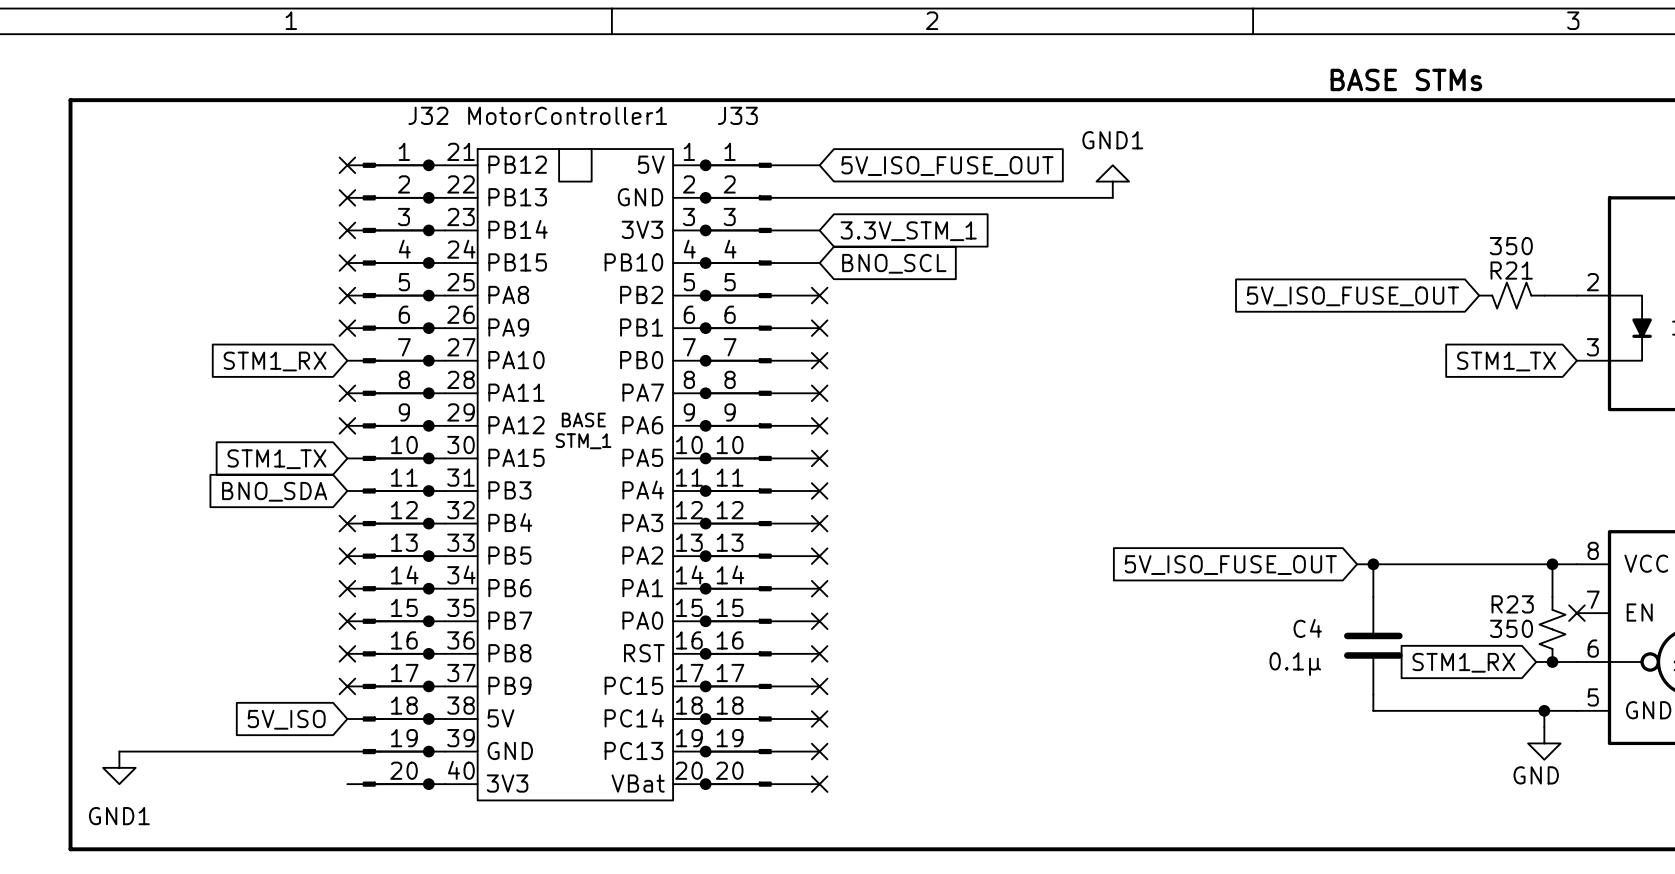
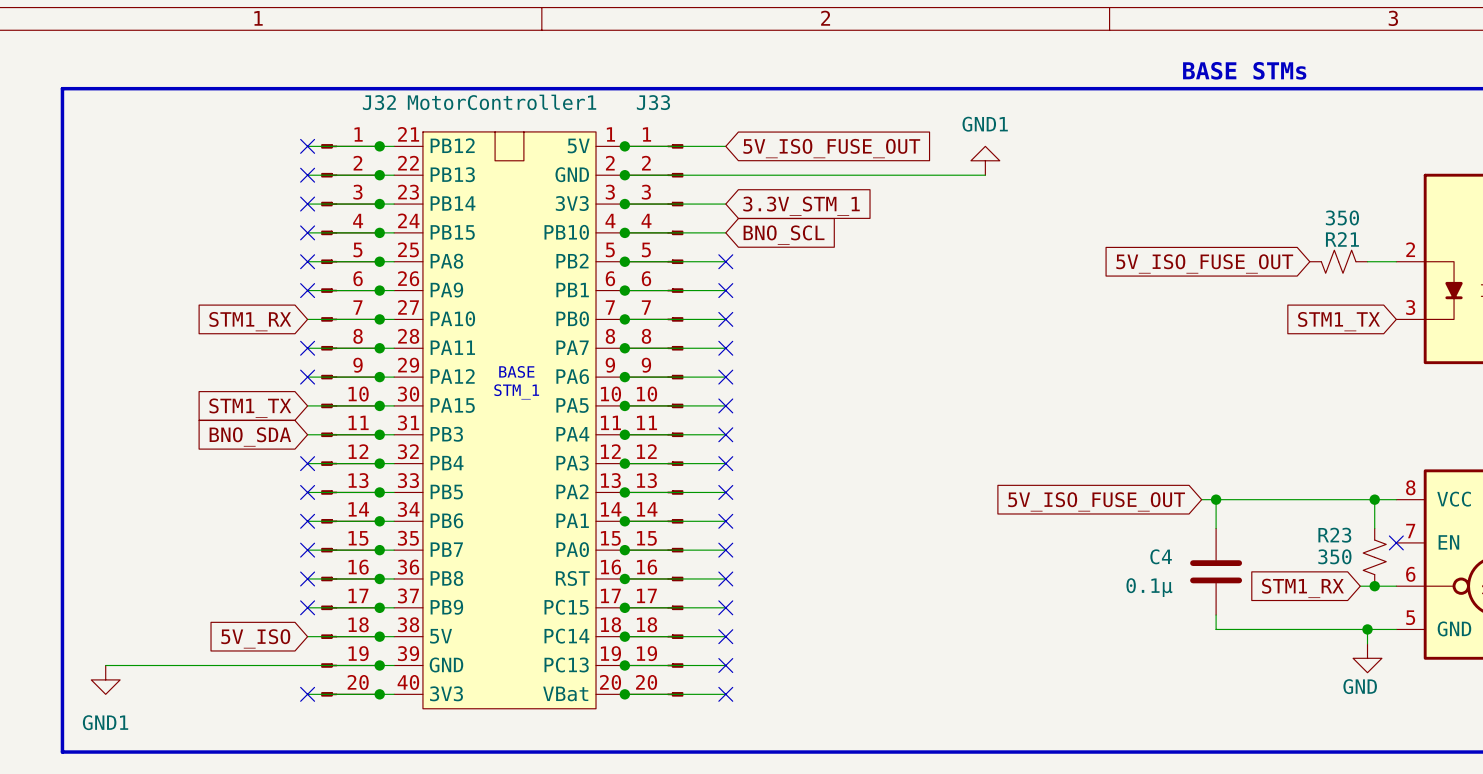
no-connect mark: none -> (307, 694)

